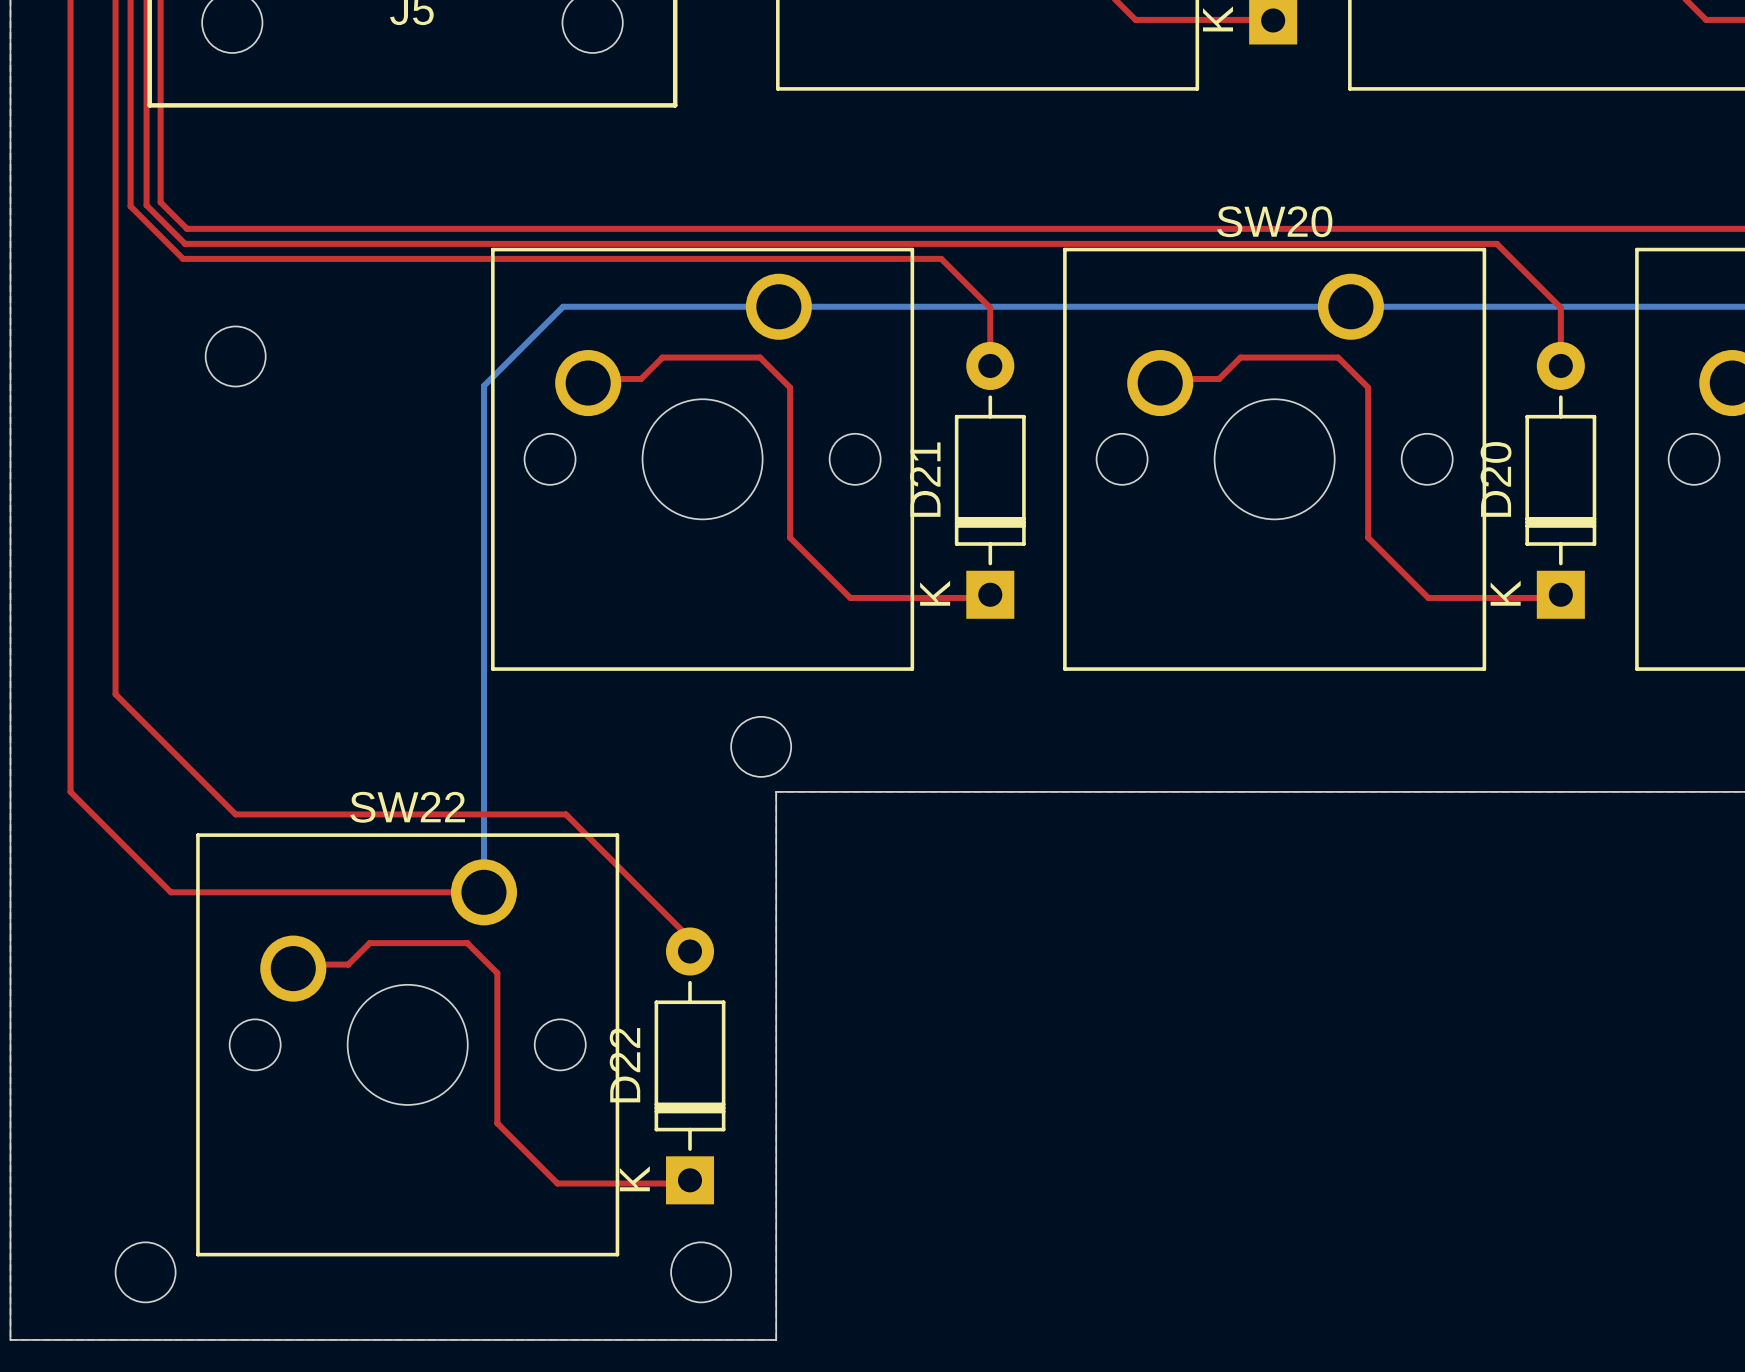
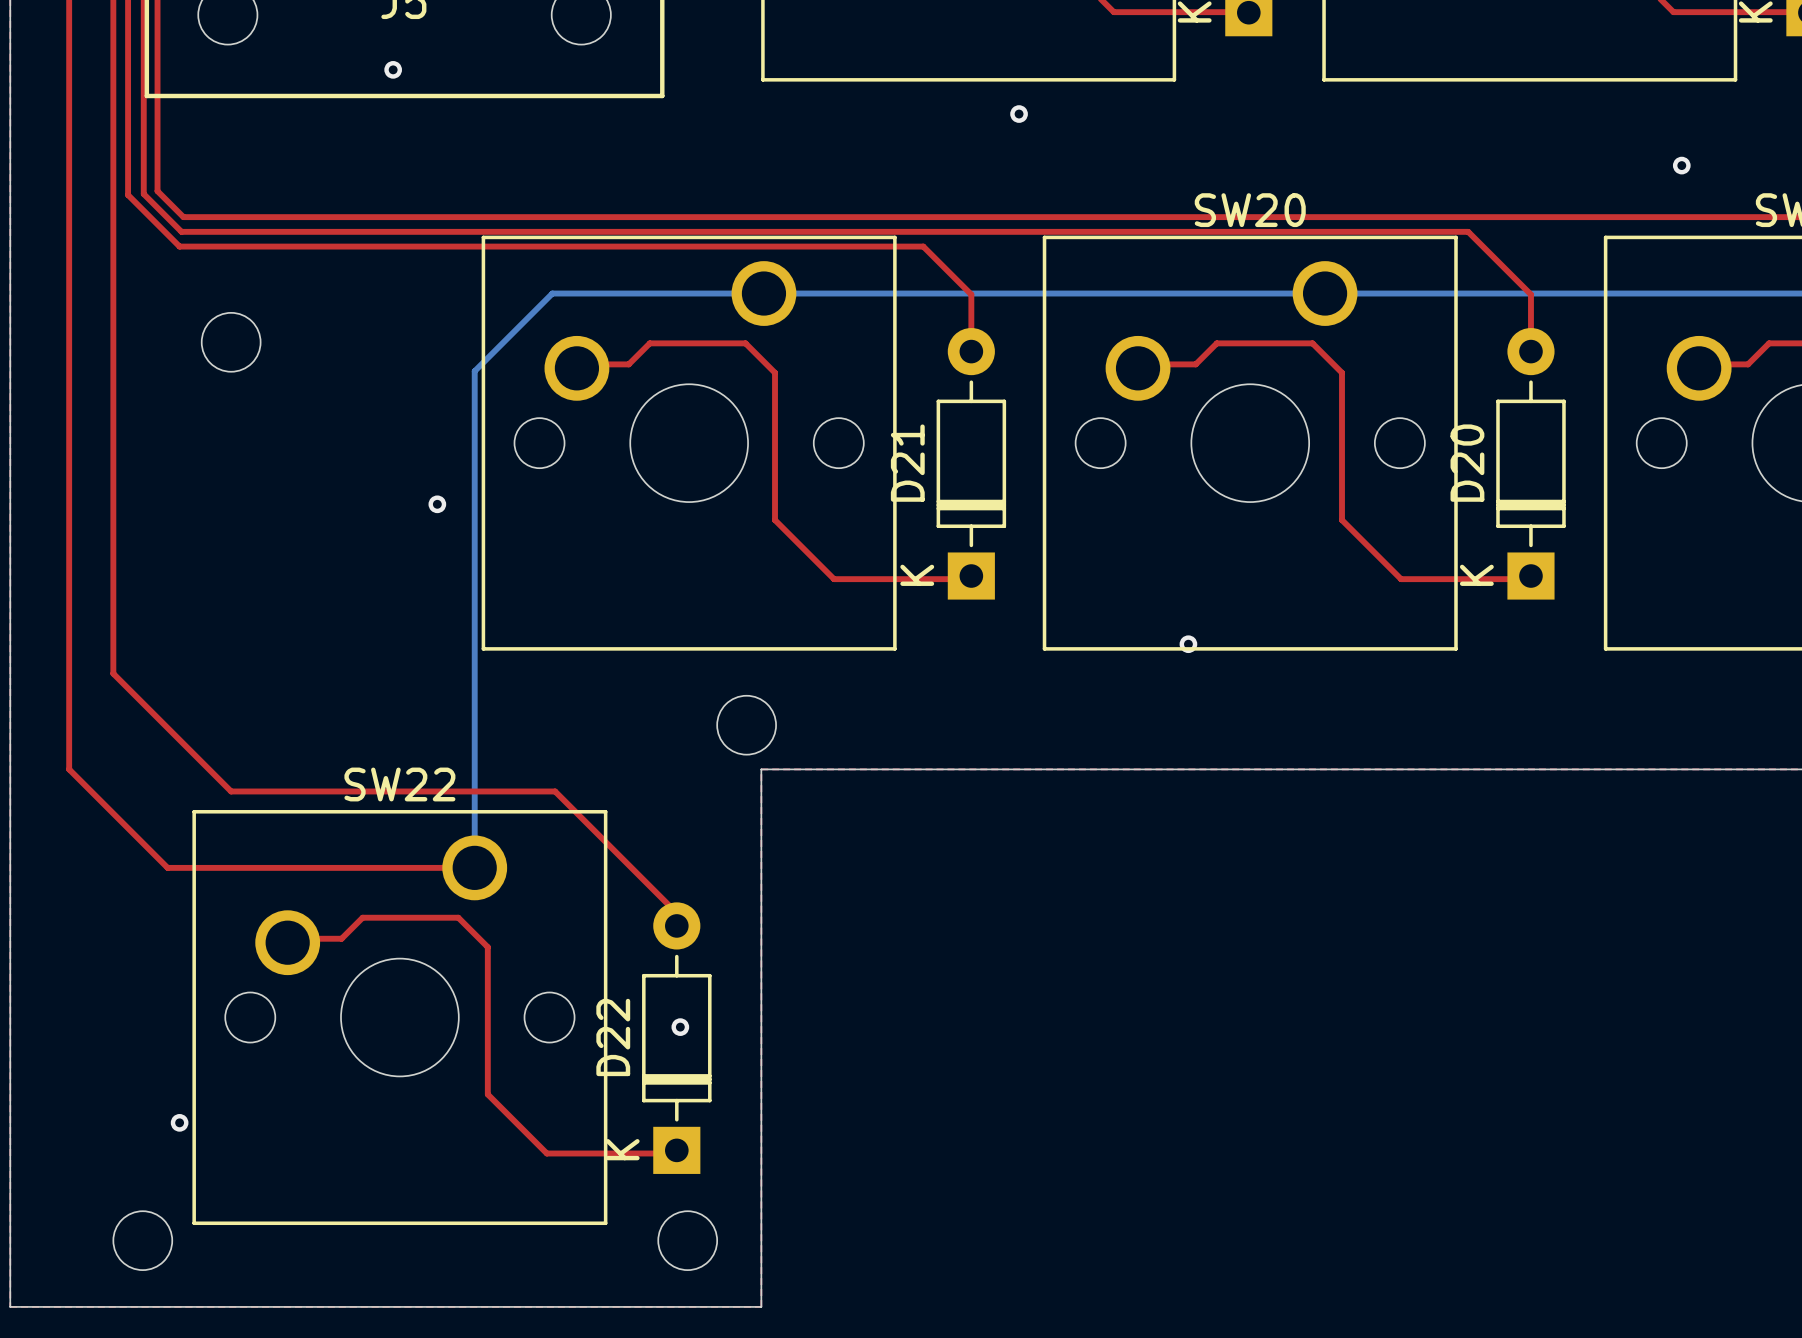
via: none -> (393, 69)
via: none -> (1019, 114)
via: none -> (1681, 165)
via: none -> (437, 504)
via: none -> (1188, 644)
via: none -> (680, 1027)
via: none -> (179, 1122)

